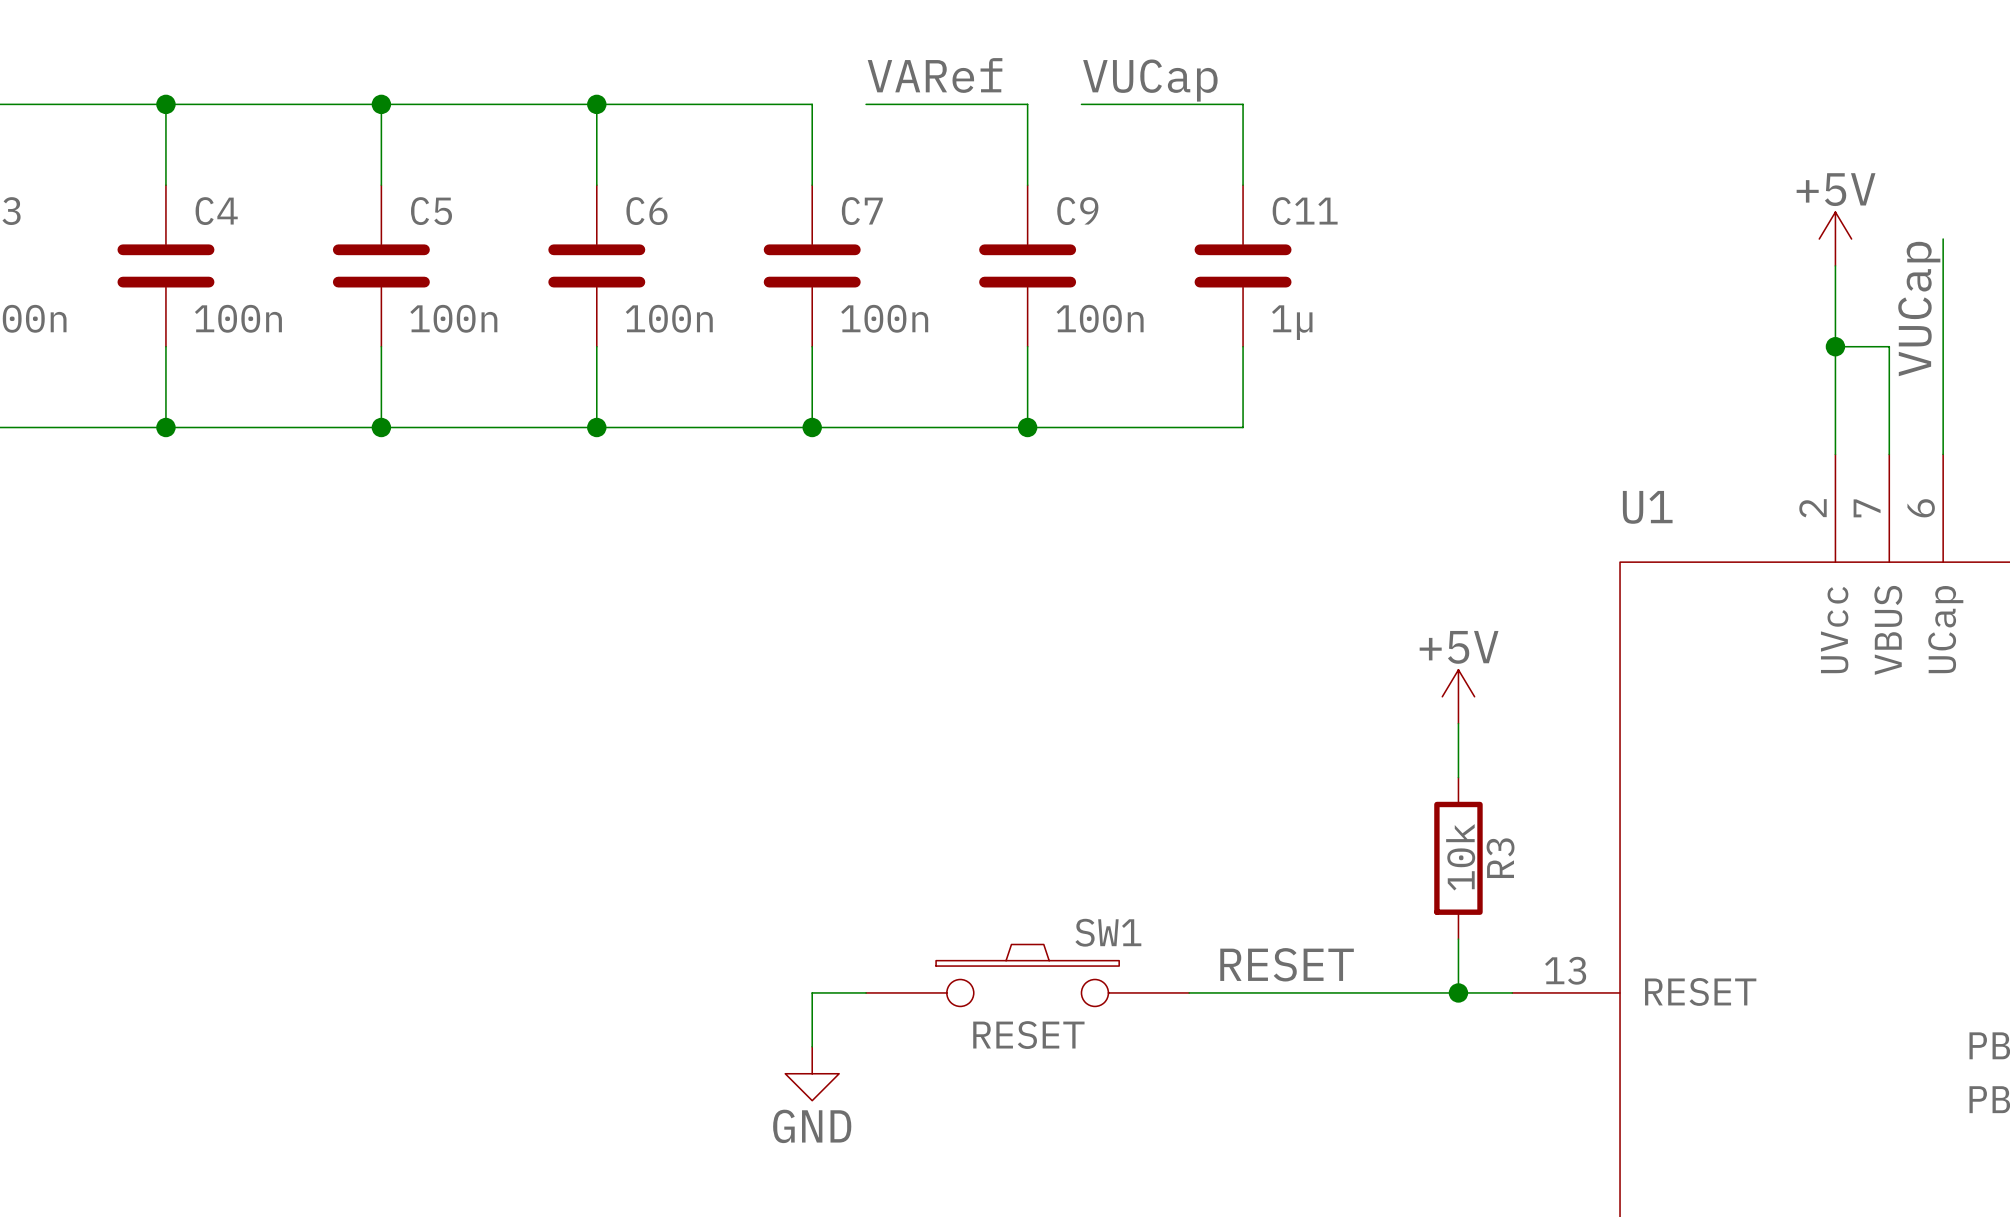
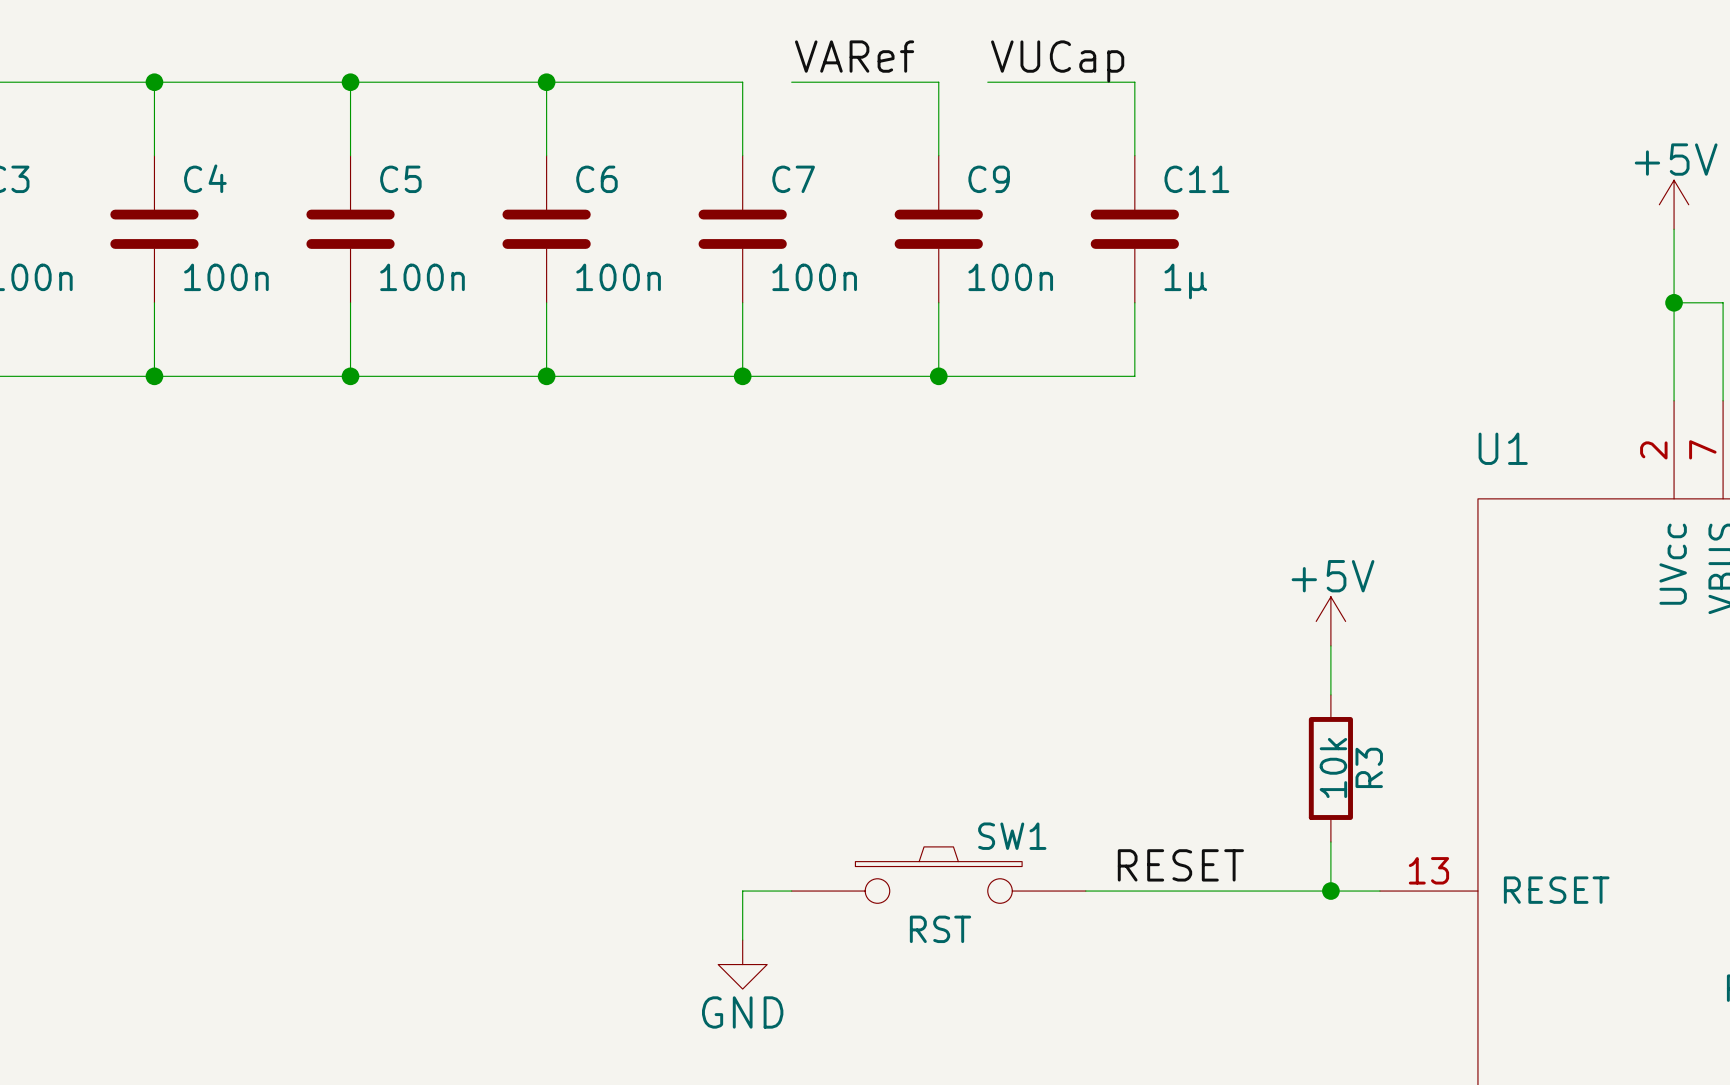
SW1 value: RESET (1028, 1035) -> RST (940, 929)

